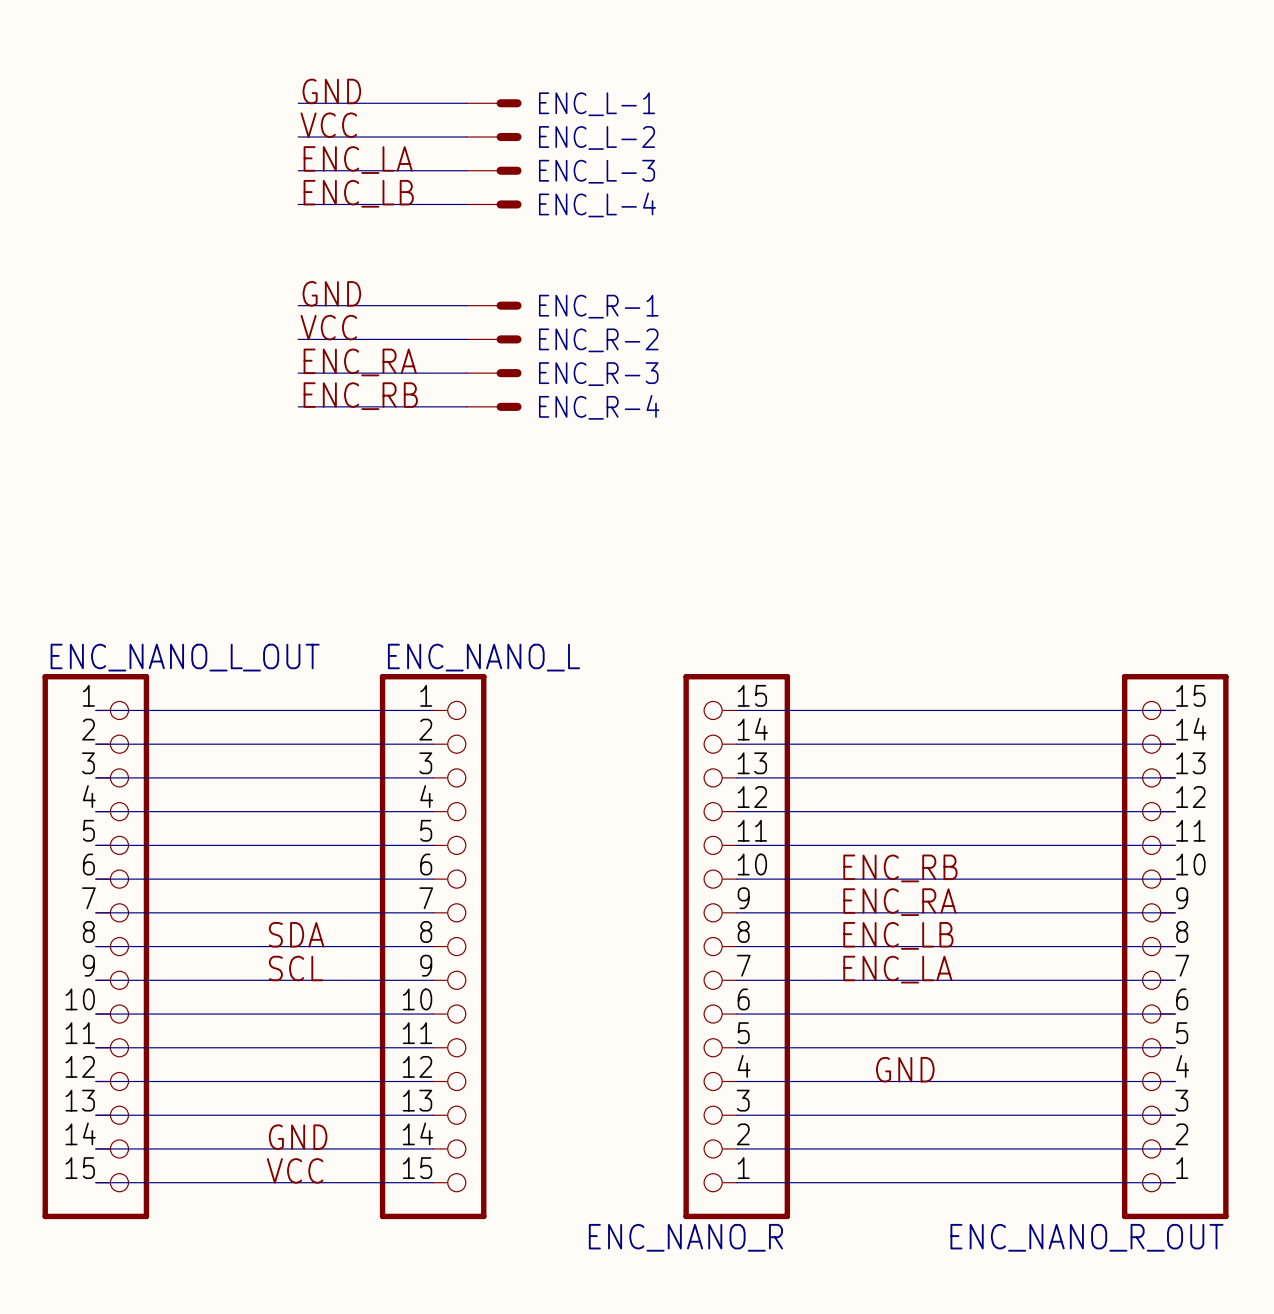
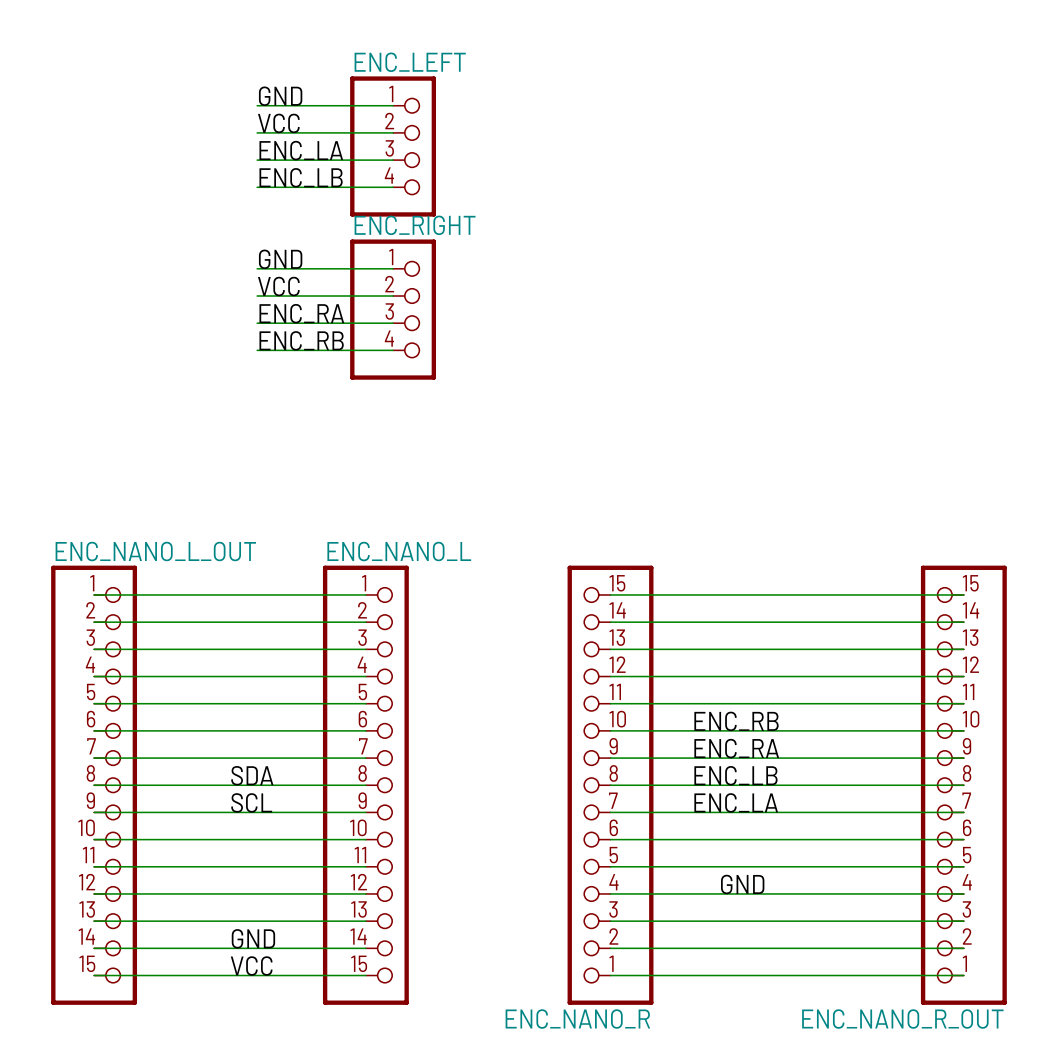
ENC_L-1: (494, 103) -> none
ENC_L-2: (494, 137) -> none
ENC_LEFT: none -> (393, 146)
ENC_L-3: (494, 170) -> none
ENC_L-4: (494, 204) -> none
ENC_R-1: (494, 305) -> none
ENC_R-2: (494, 339) -> none
ENC_RIGHT: none -> (393, 309)
ENC_R-3: (494, 373) -> none
ENC_R-4: (494, 406) -> none

